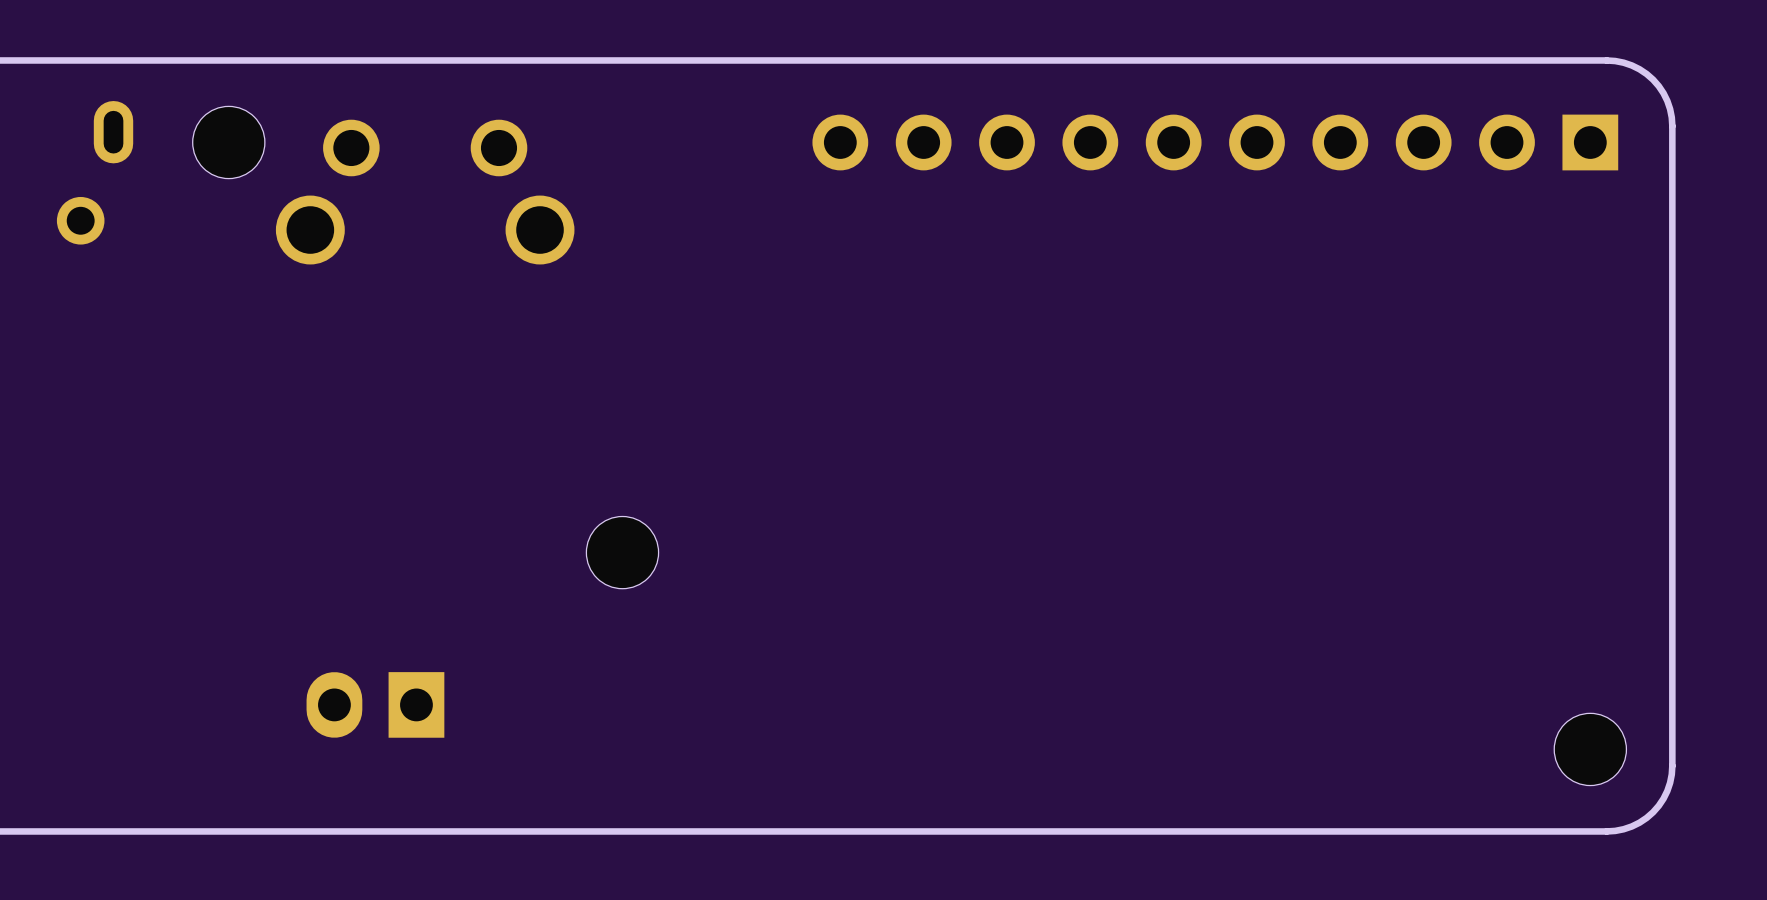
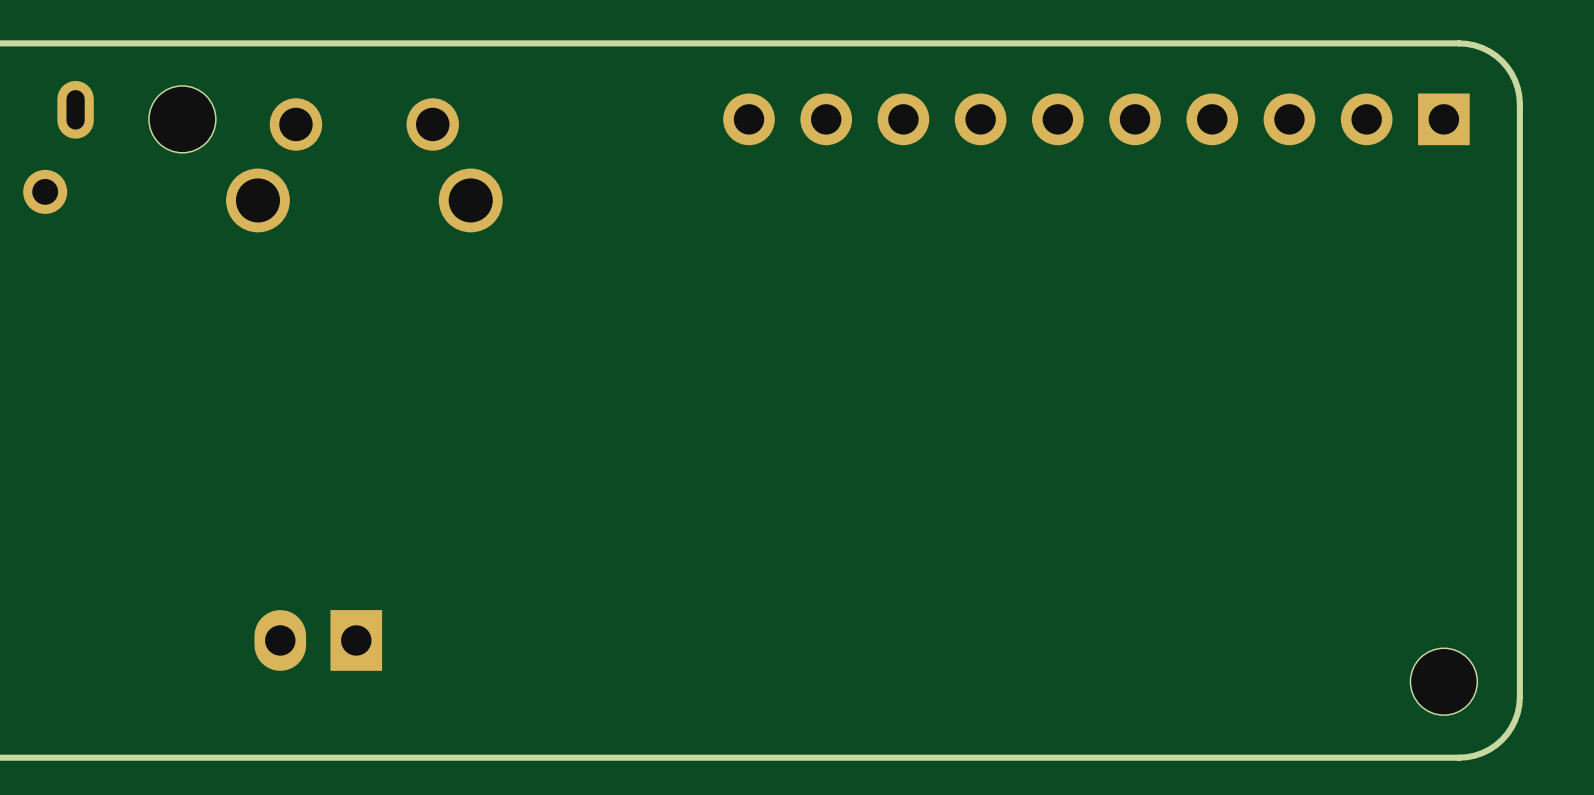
part: (622, 552) -> none

